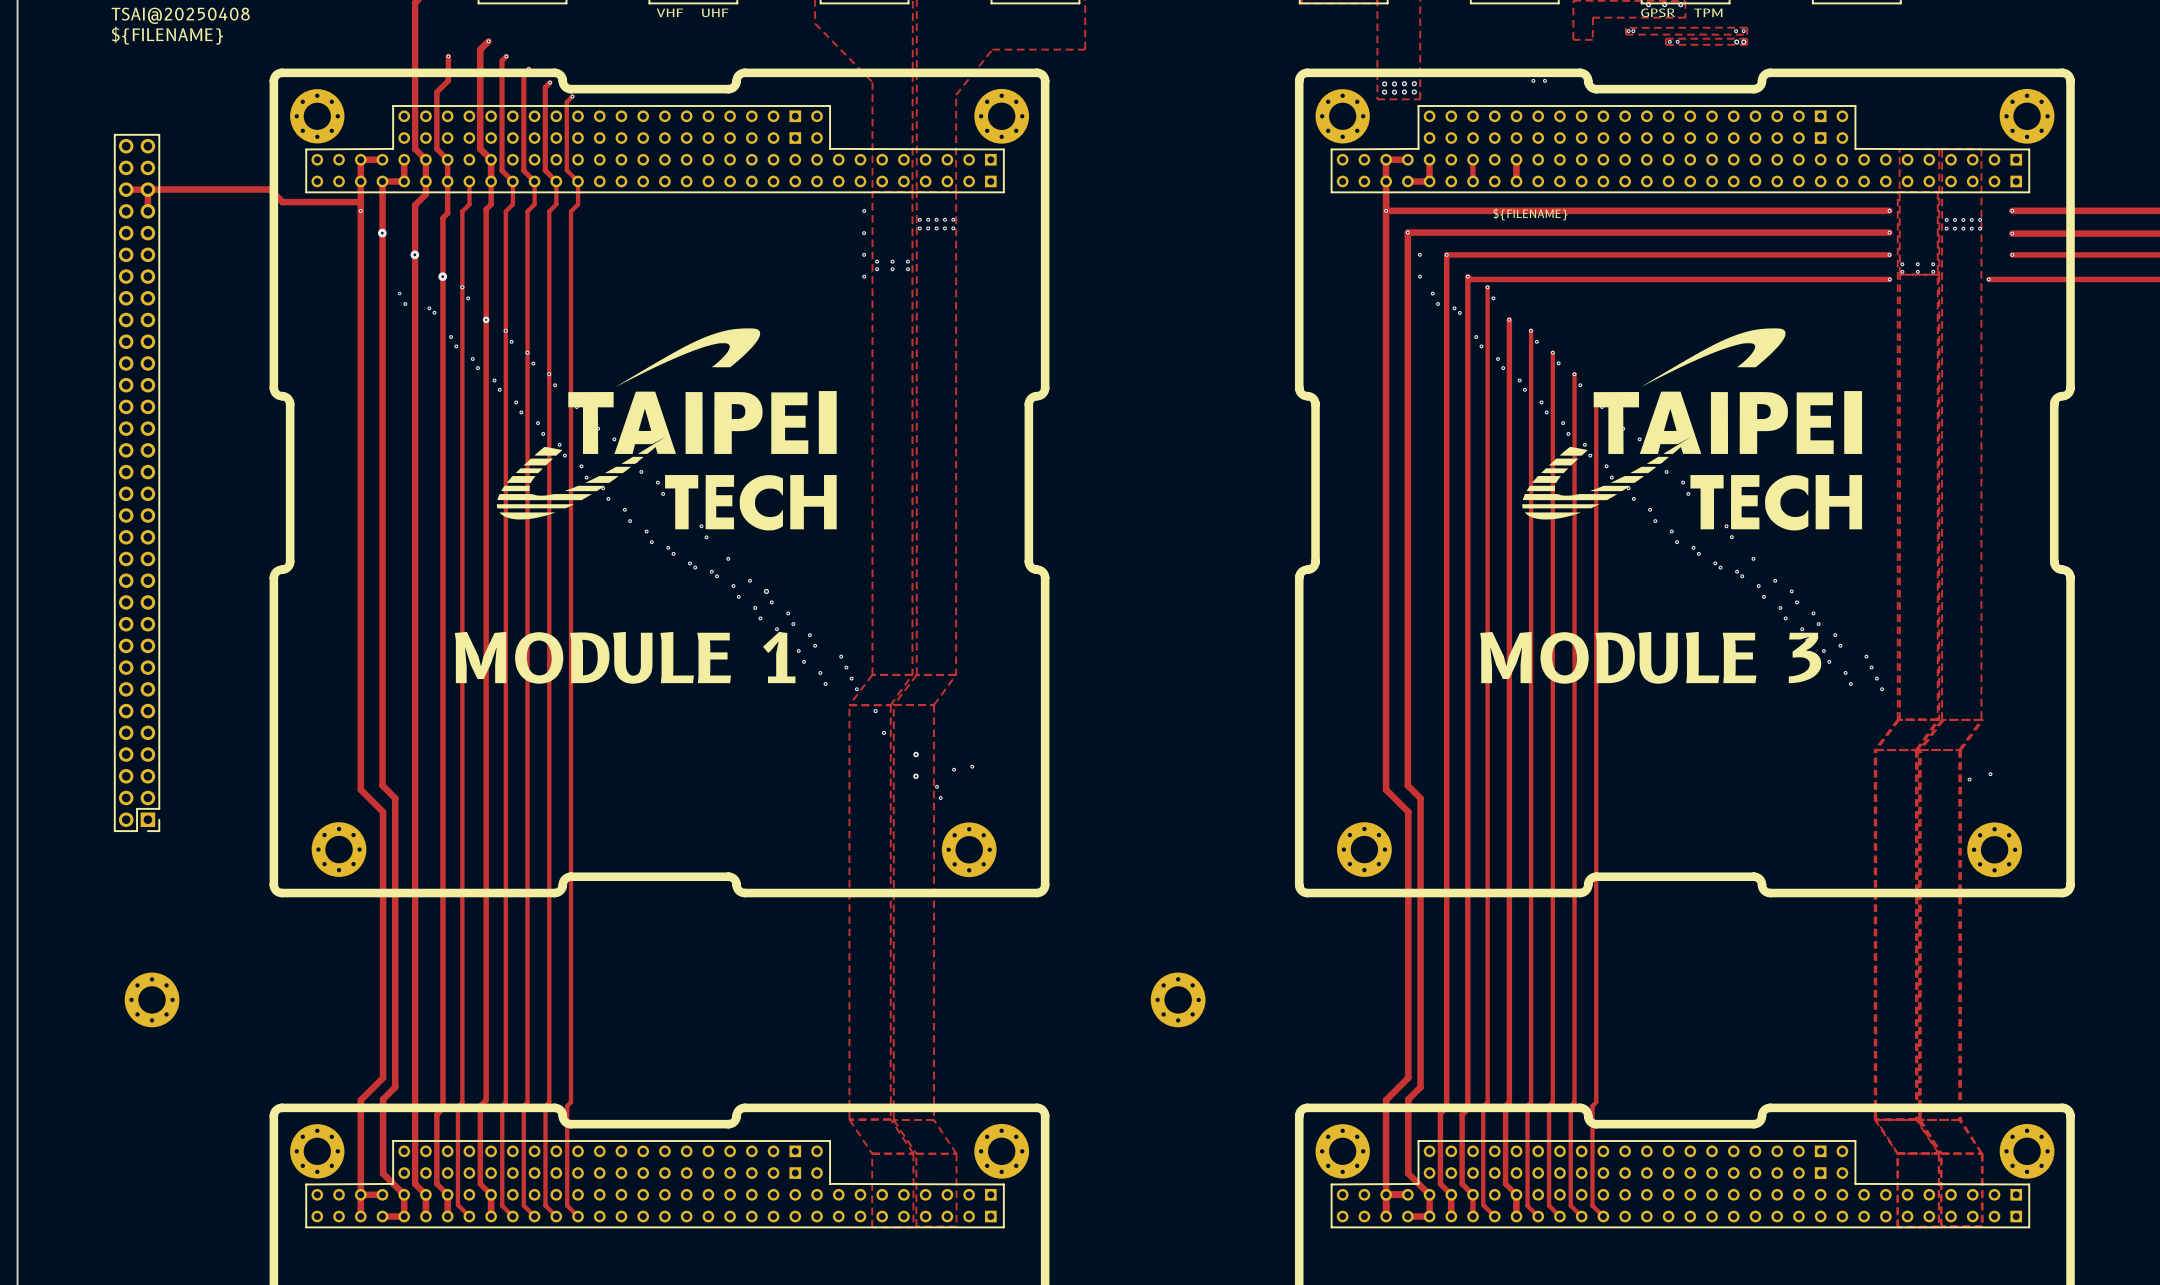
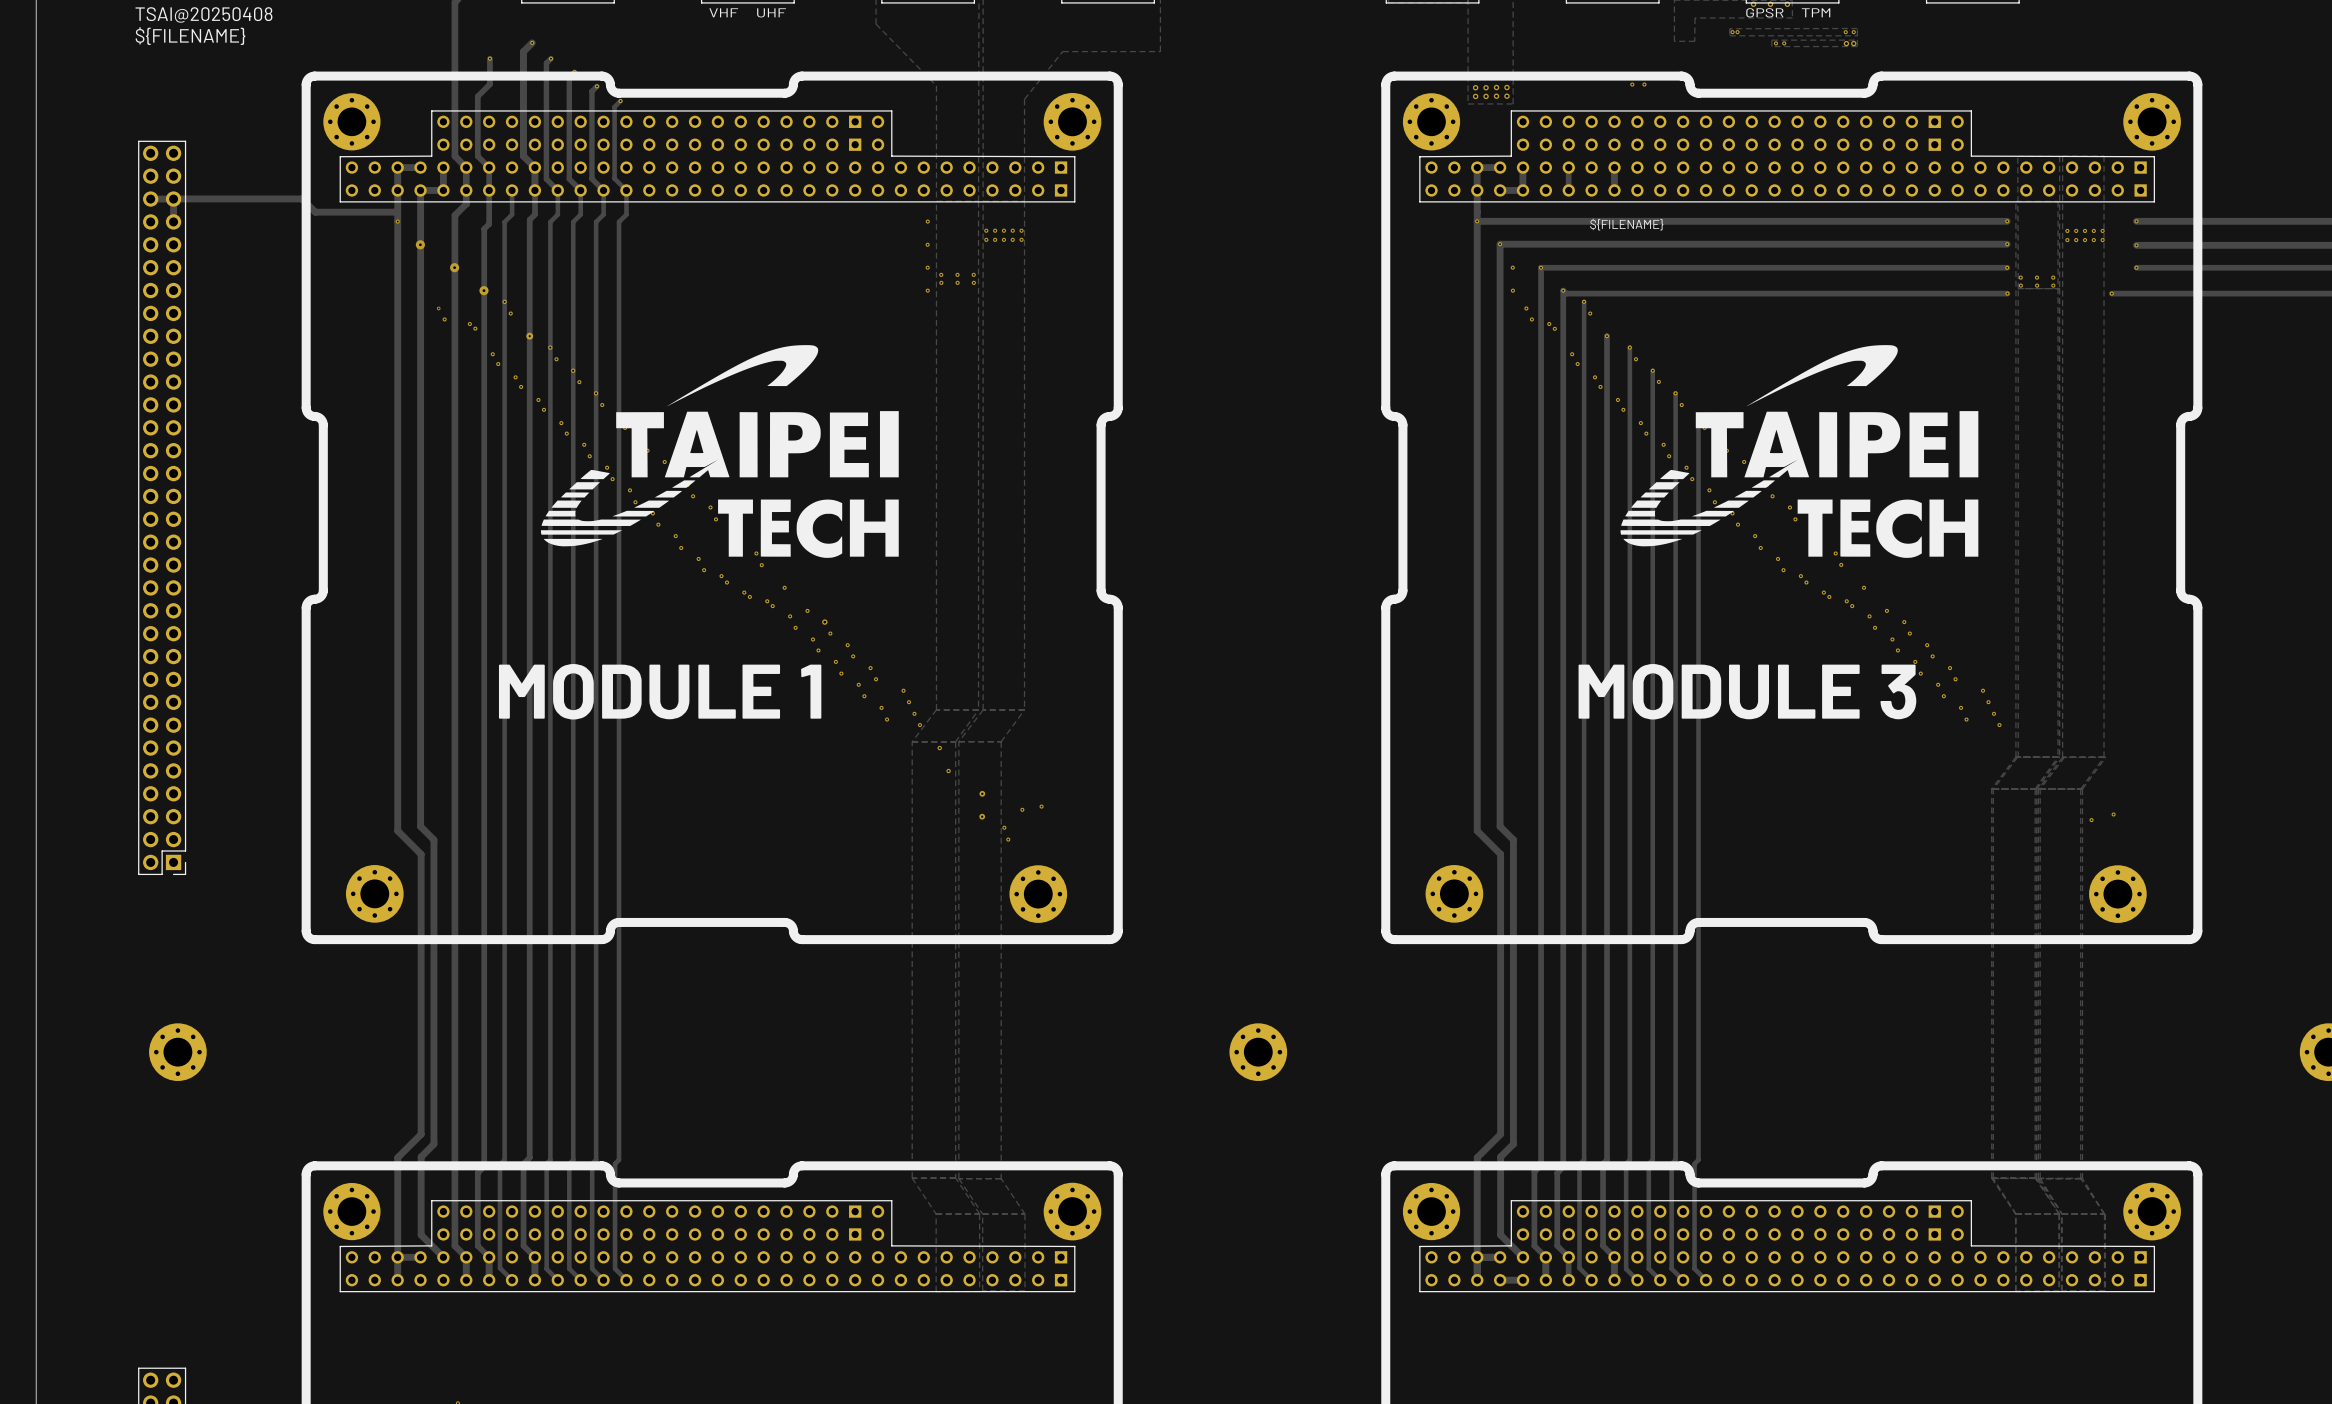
track: (404, 1194) (404, 1216) (382, 1216) -> none
track: (1429, 1194) (1429, 1216) -> none

